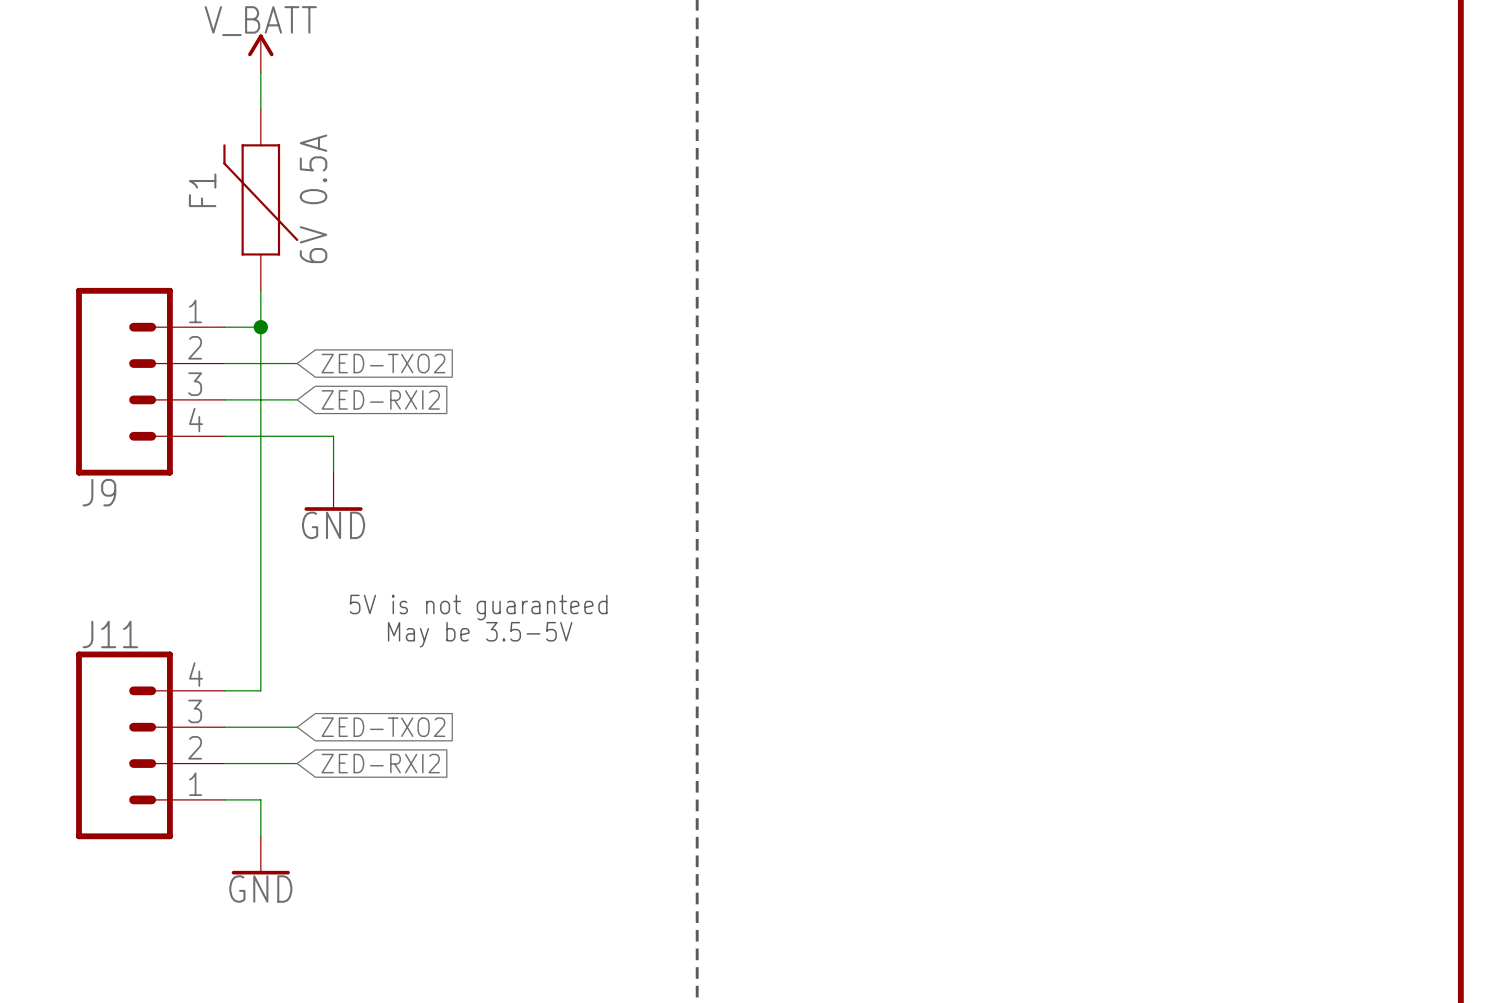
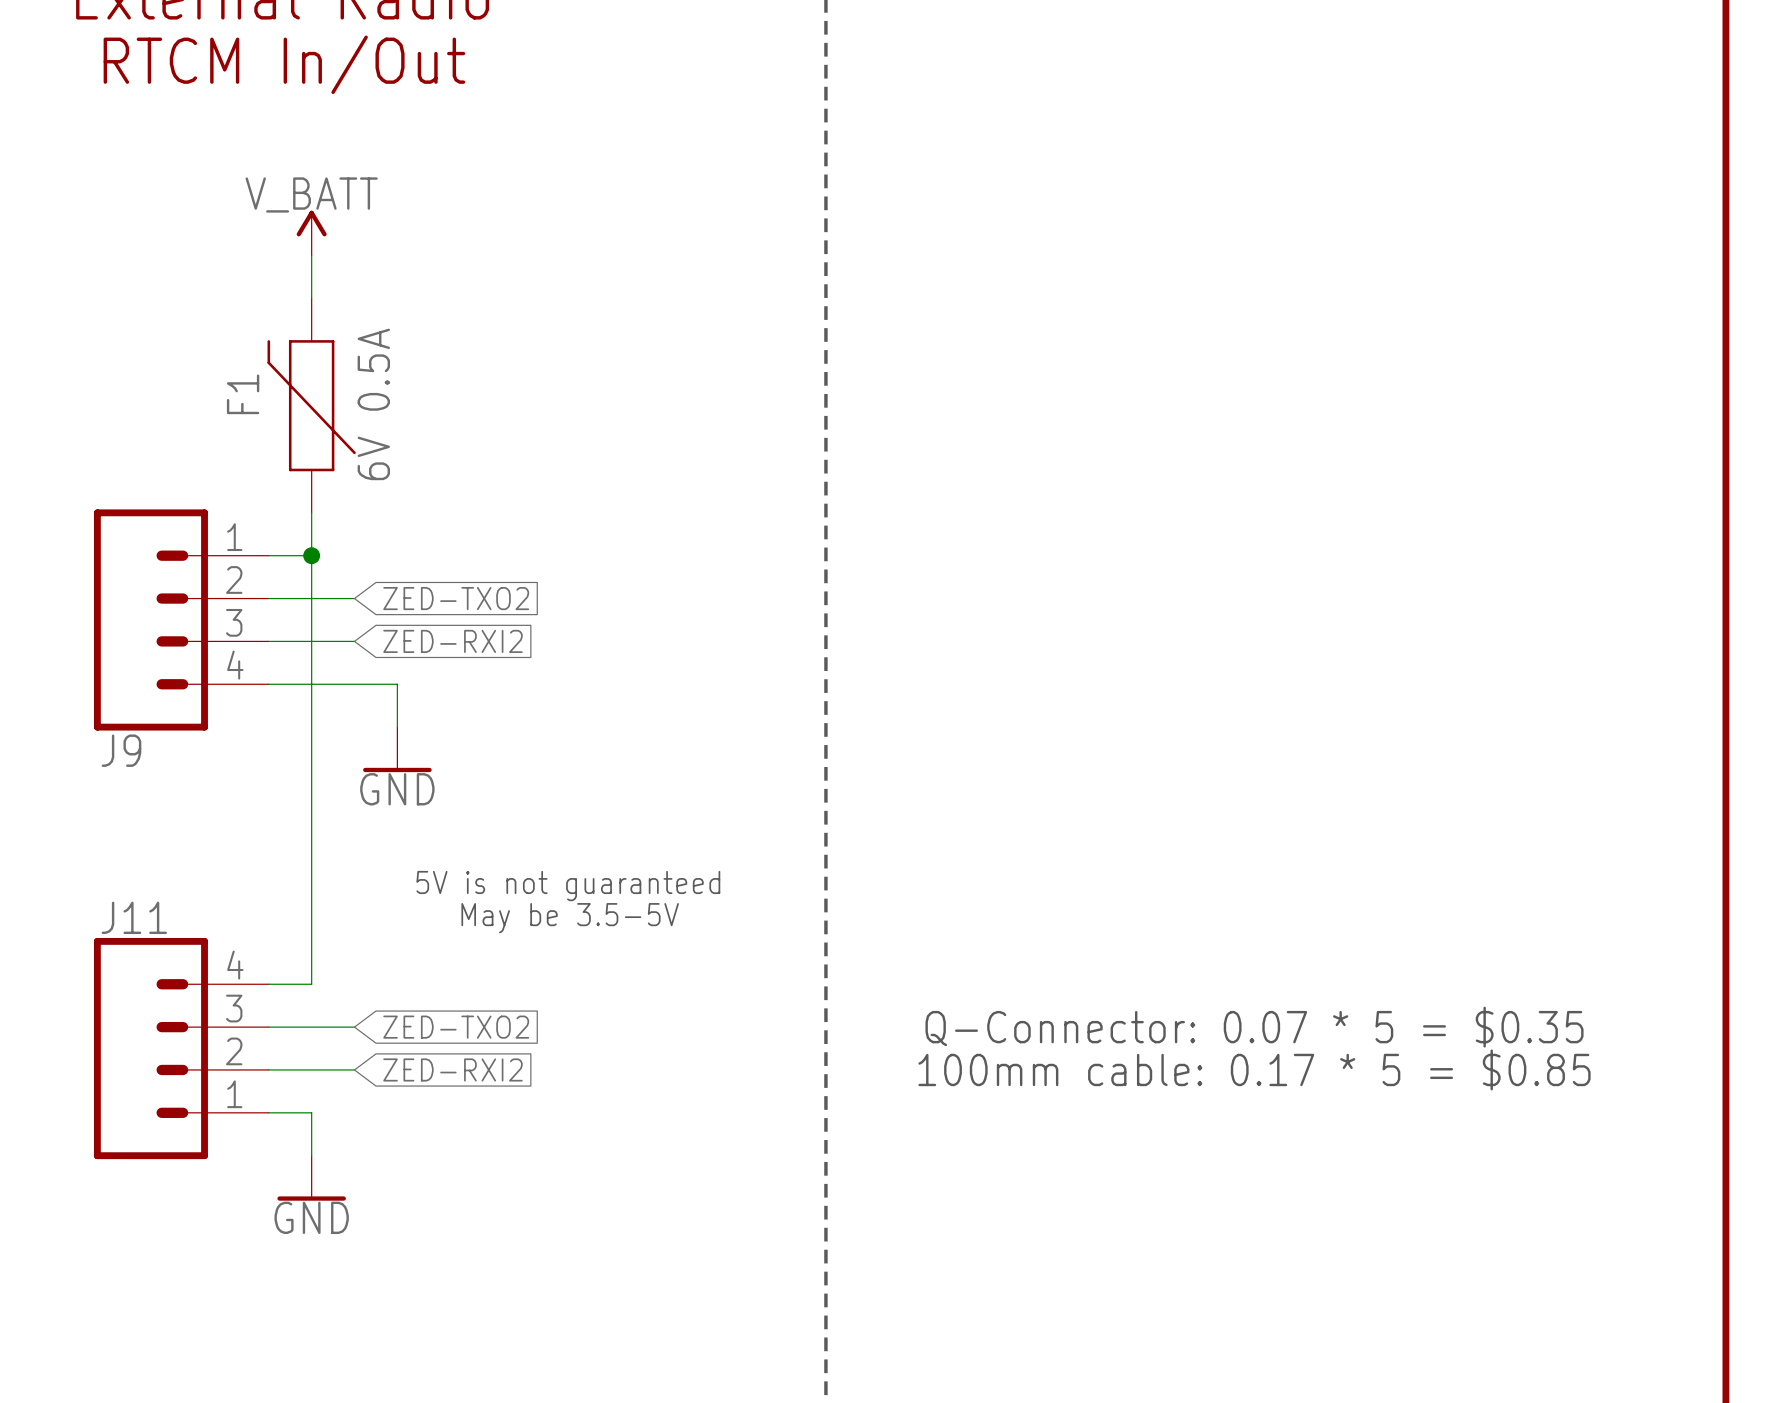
text: none -> Q-Connector: 0.07 * 5 = $0.35 (1254, 1027)
text: none -> 100mm cable: 0.17 * 5 = $0.85 (1254, 1069)

